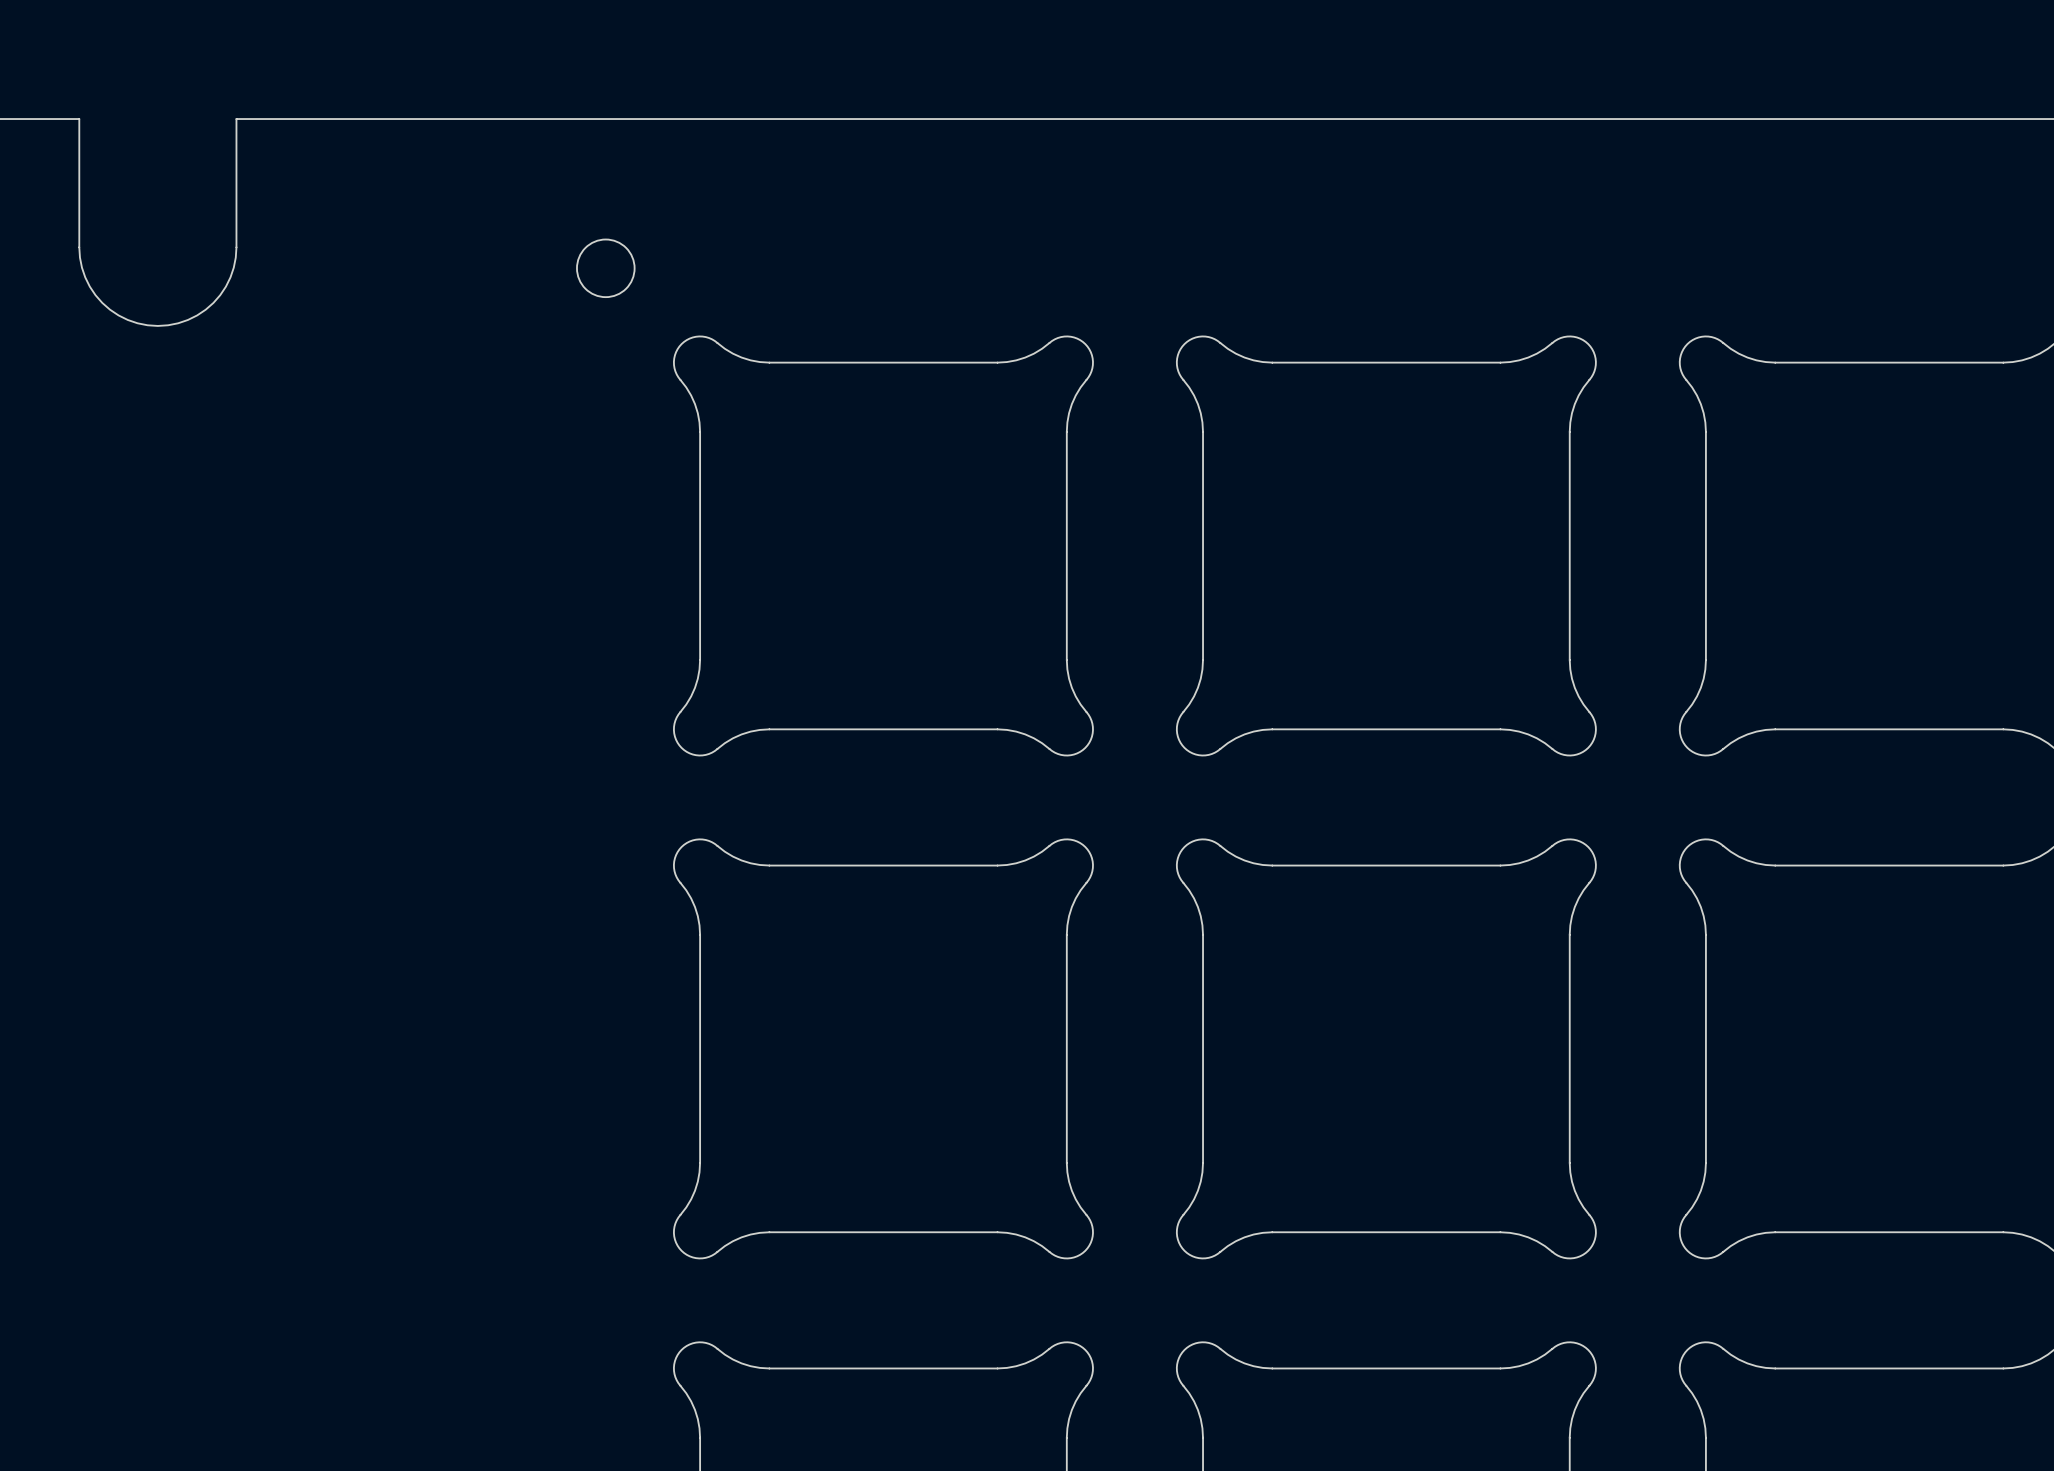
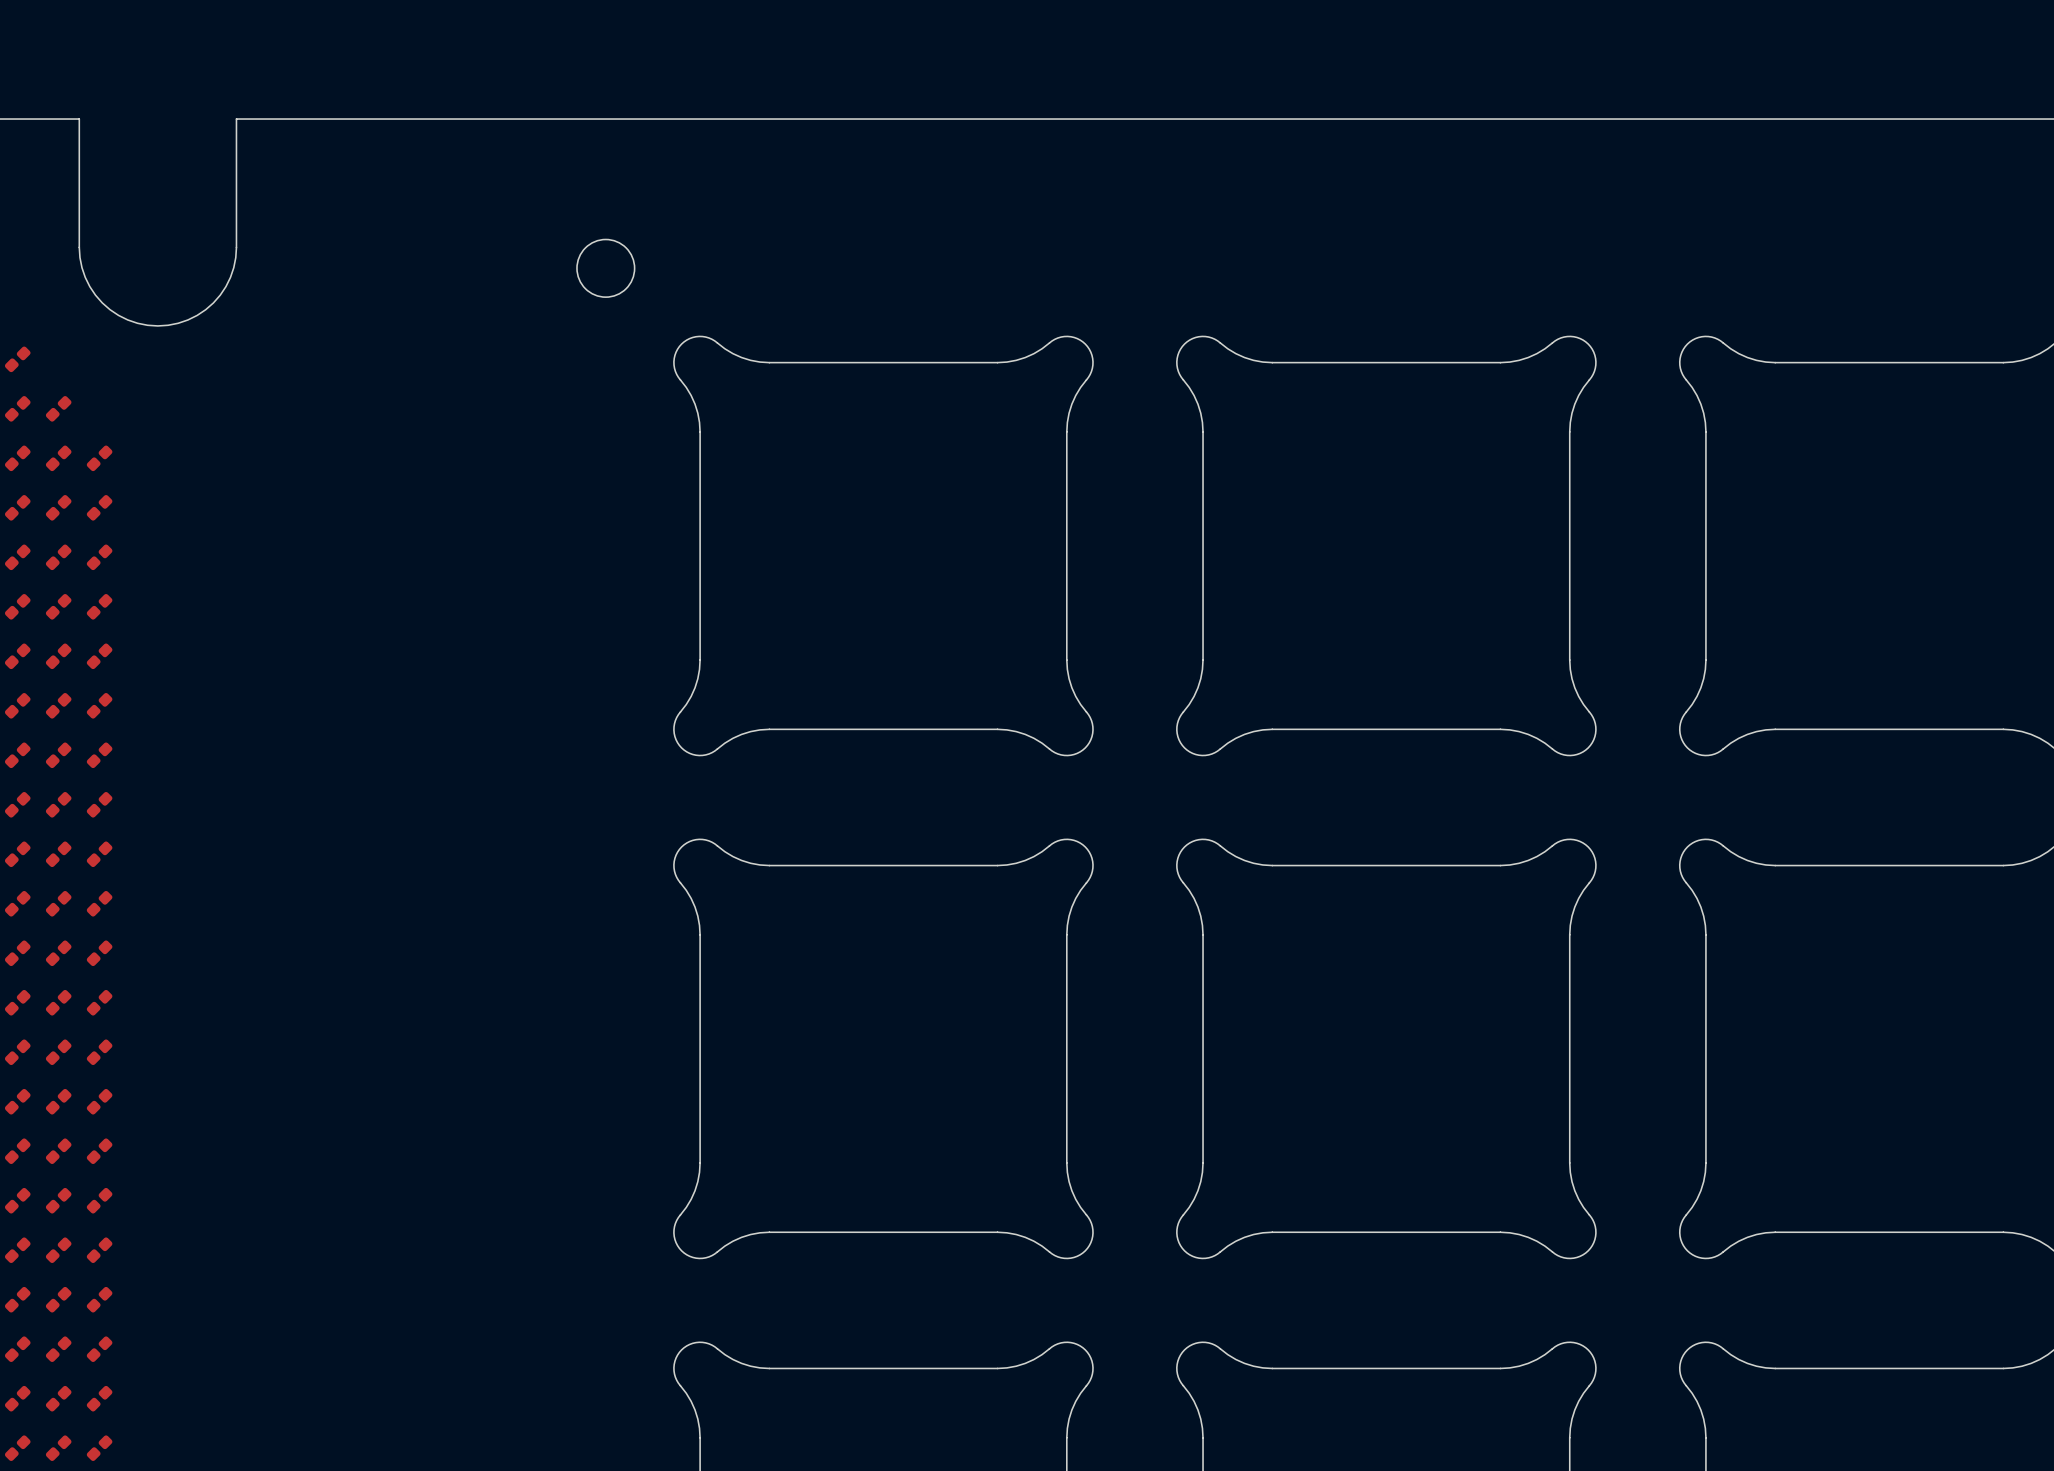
part: none -> (17, 359)
part: none -> (17, 408)
part: none -> (58, 408)
part: none -> (17, 458)
part: none -> (58, 458)
part: none -> (99, 458)
part: none -> (17, 507)
part: none -> (58, 507)
part: none -> (99, 507)
part: none -> (17, 557)
part: none -> (58, 557)
part: none -> (99, 557)
part: none -> (17, 606)
part: none -> (58, 606)
part: none -> (99, 606)
part: none -> (17, 656)
part: none -> (58, 656)
part: none -> (99, 656)
part: none -> (17, 705)
part: none -> (58, 705)
part: none -> (99, 705)
part: none -> (17, 755)
part: none -> (58, 755)
part: none -> (99, 755)
part: none -> (17, 804)
part: none -> (58, 804)
part: none -> (99, 804)
part: none -> (17, 854)
part: none -> (58, 854)
part: none -> (99, 854)
part: none -> (17, 903)
part: none -> (58, 903)
part: none -> (99, 903)
part: none -> (17, 953)
part: none -> (58, 953)
part: none -> (99, 953)
part: none -> (17, 1002)
part: none -> (58, 1002)
part: none -> (99, 1002)
part: none -> (17, 1052)
part: none -> (58, 1052)
part: none -> (99, 1052)
part: none -> (17, 1101)
part: none -> (58, 1101)
part: none -> (99, 1101)
part: none -> (17, 1151)
part: none -> (58, 1151)
part: none -> (99, 1151)
part: none -> (17, 1200)
part: none -> (58, 1200)
part: none -> (99, 1200)
part: none -> (17, 1250)
part: none -> (58, 1250)
part: none -> (99, 1250)
part: none -> (17, 1299)
part: none -> (58, 1299)
part: none -> (99, 1299)
part: none -> (17, 1349)
part: none -> (58, 1349)
part: none -> (99, 1349)
part: none -> (17, 1398)
part: none -> (58, 1398)
part: none -> (99, 1398)
part: none -> (17, 1448)
part: none -> (58, 1448)
part: none -> (99, 1448)

